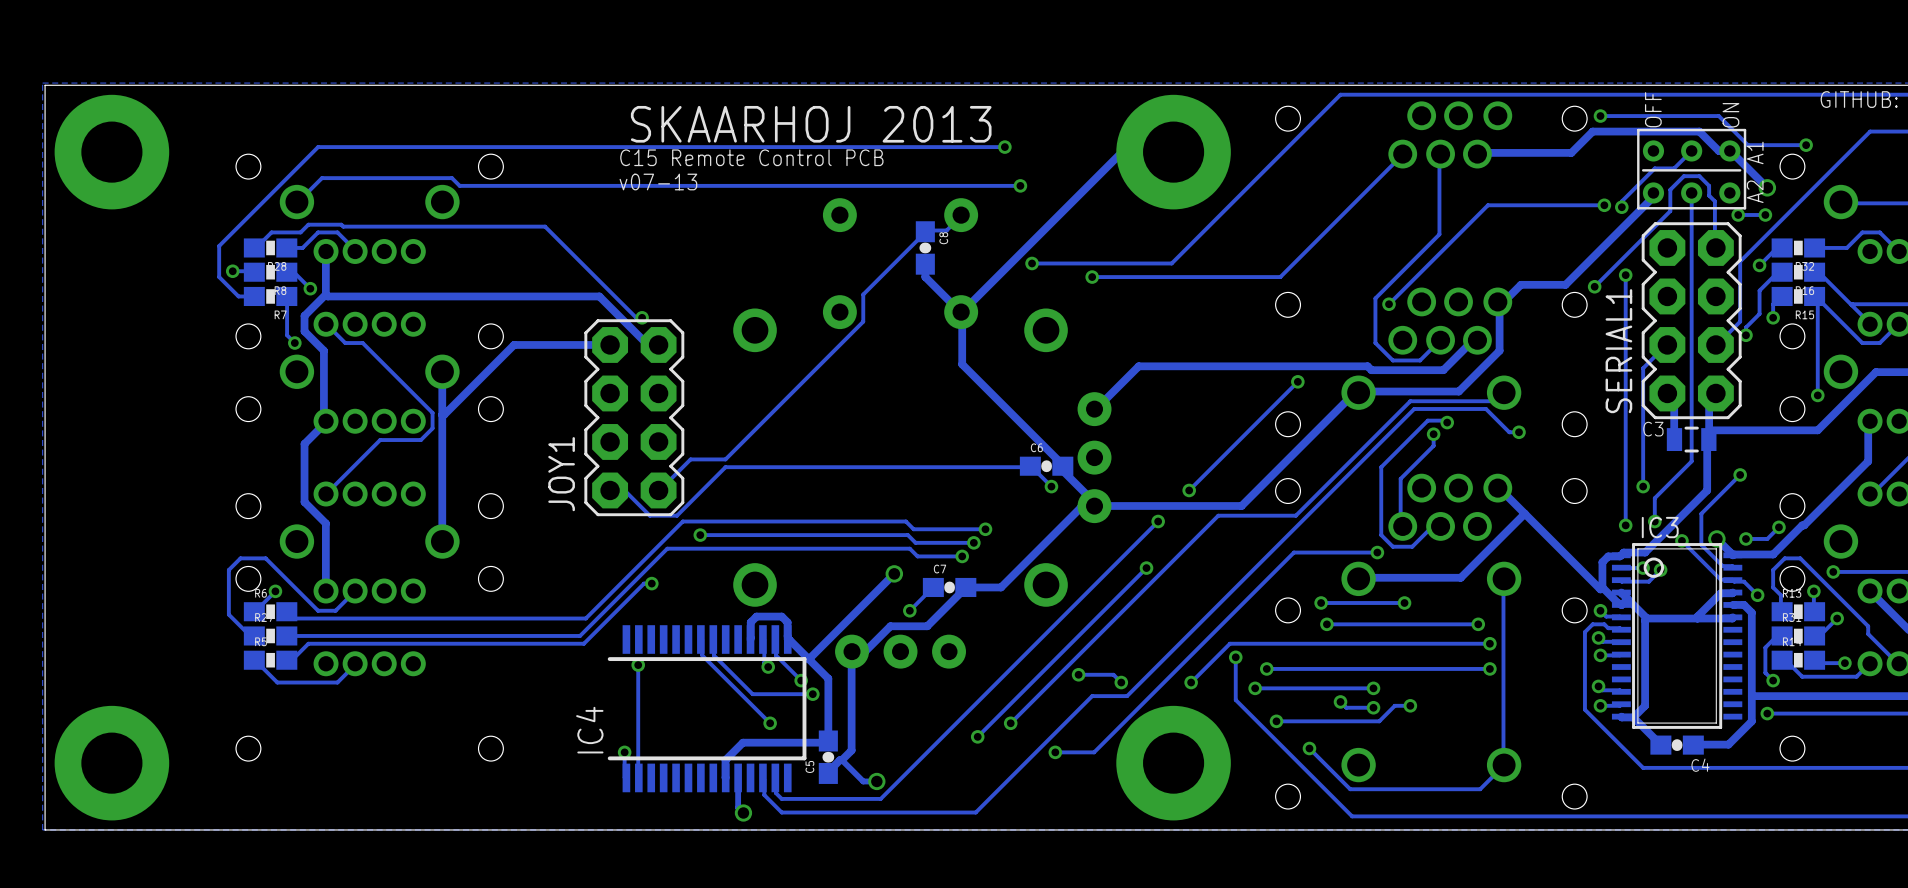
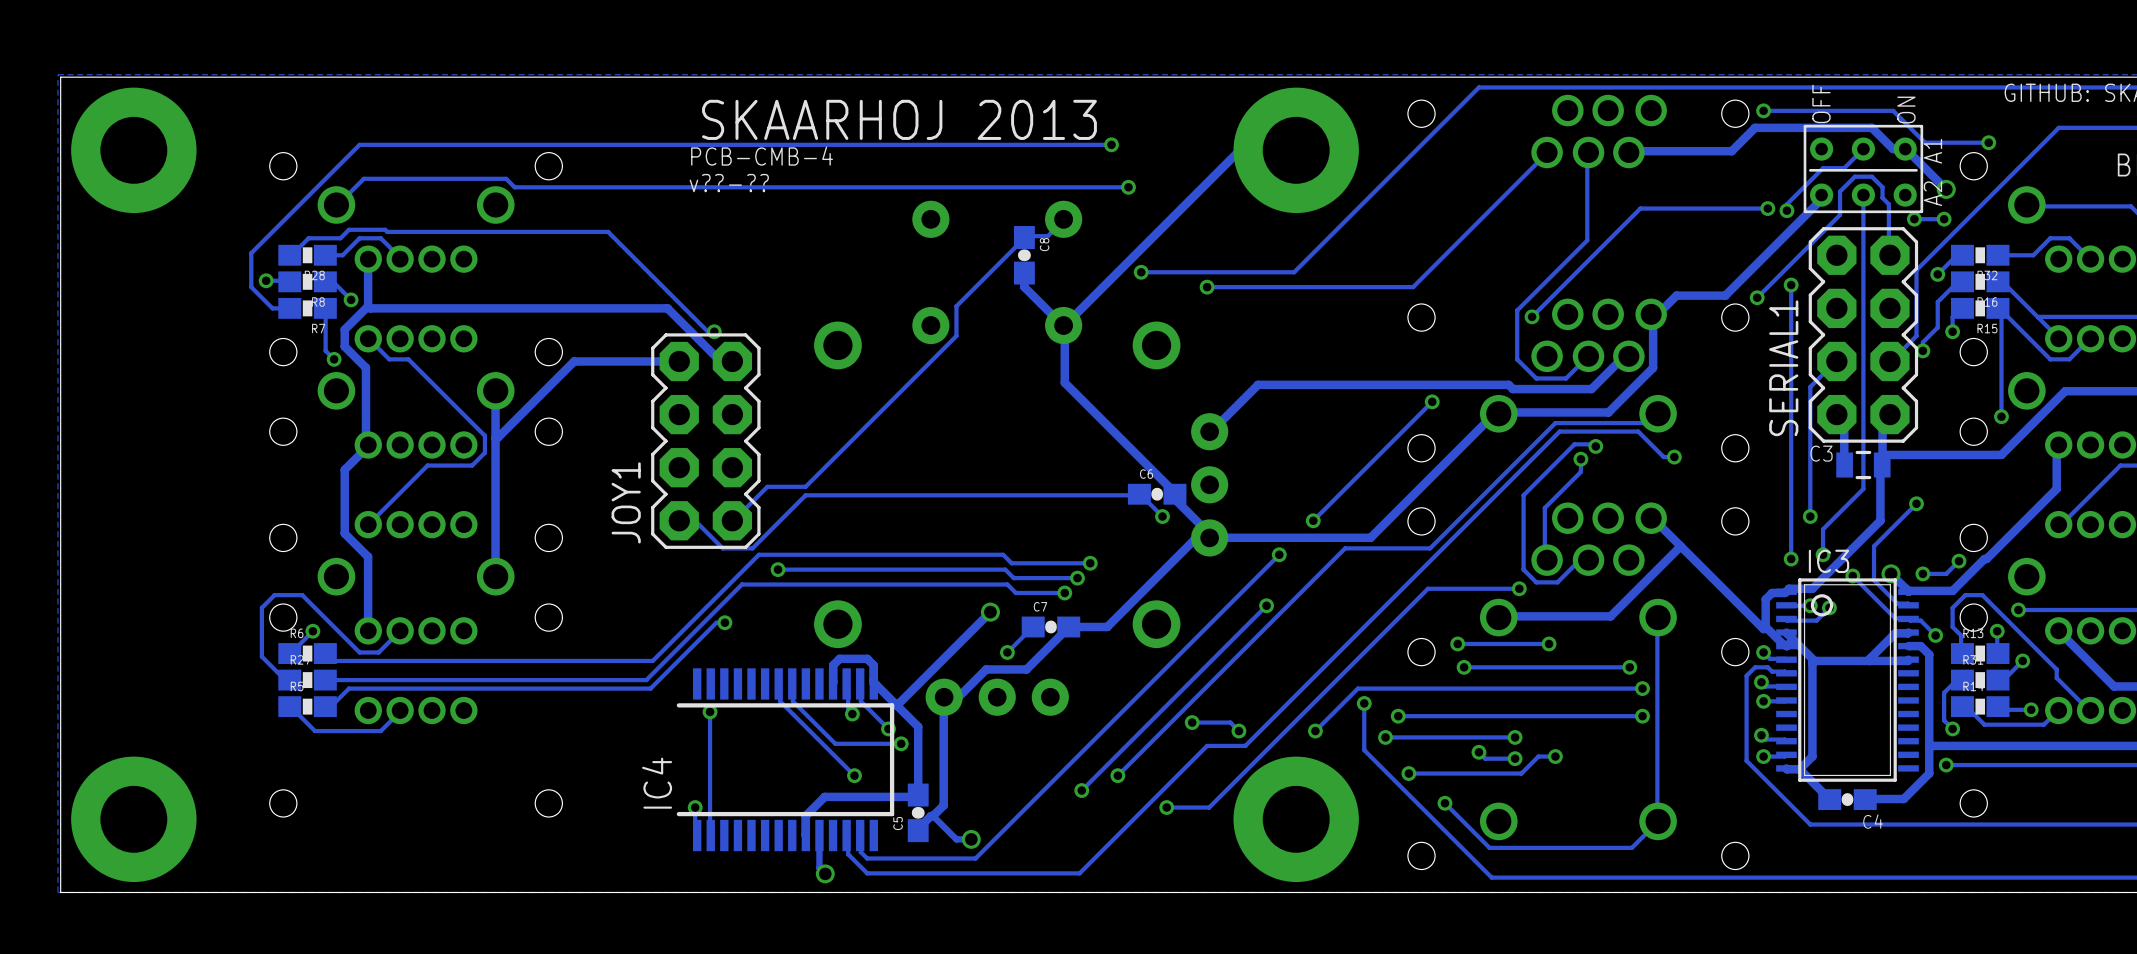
text: C15 Remote Control PCB (751, 157) -> PCB-CMB-4 (762, 156)
text: v07-13 (658, 182) -> v??-?? (729, 183)

